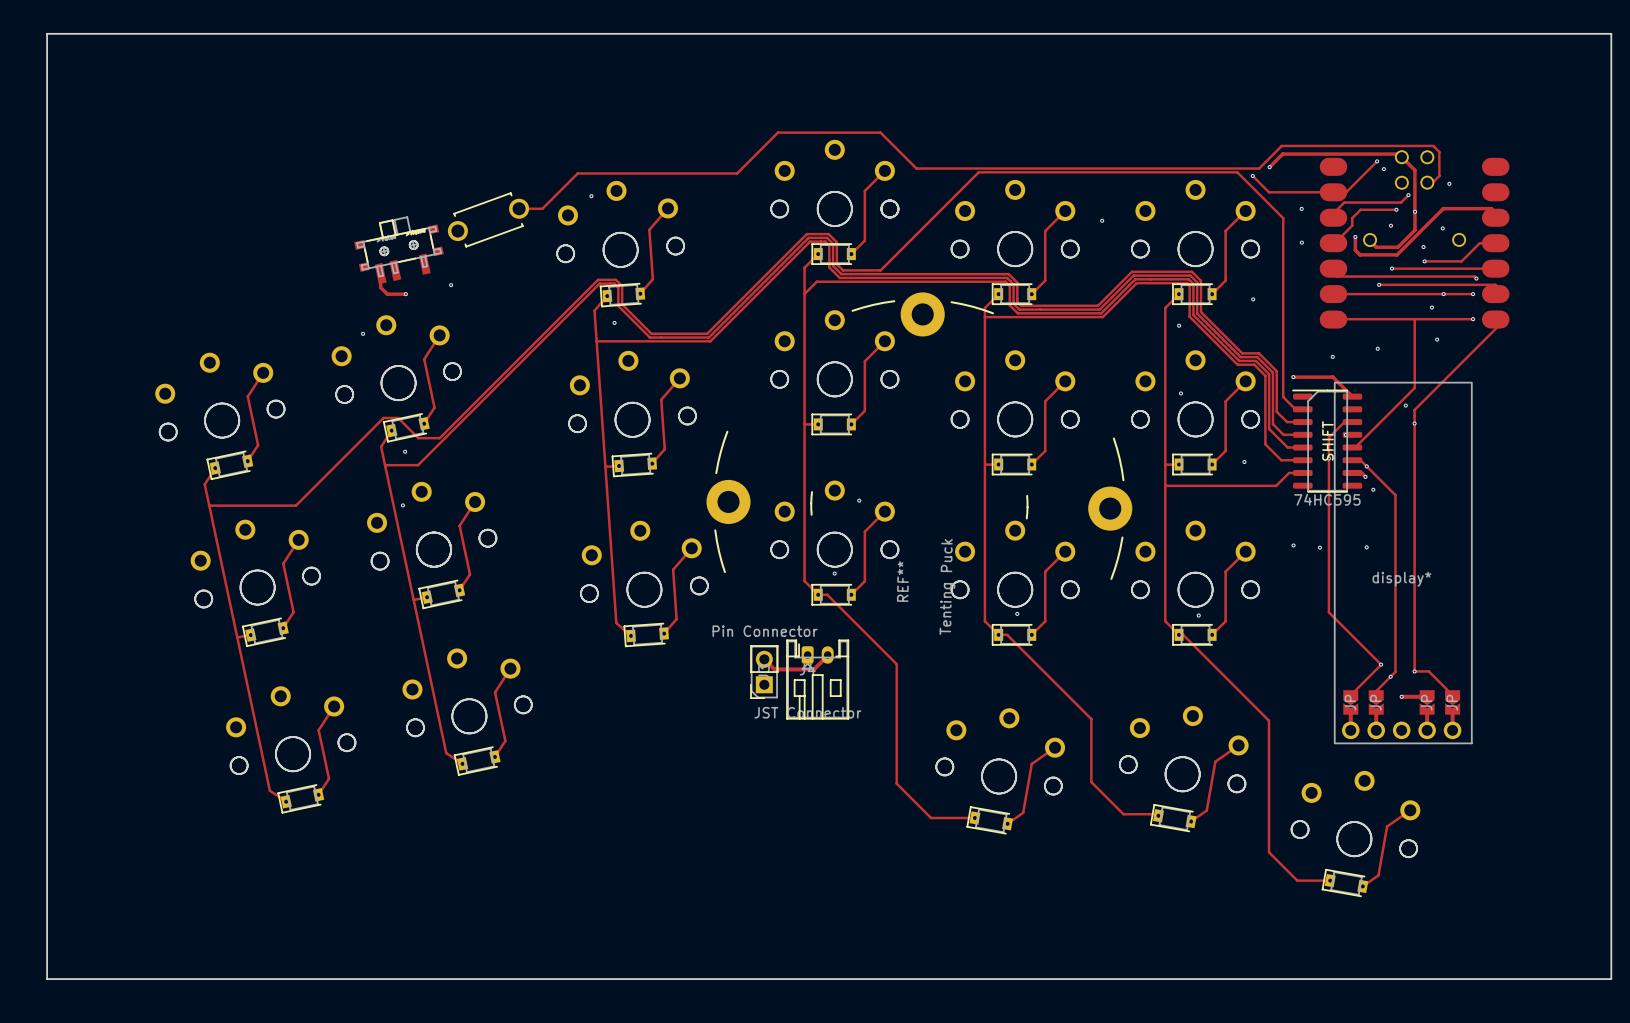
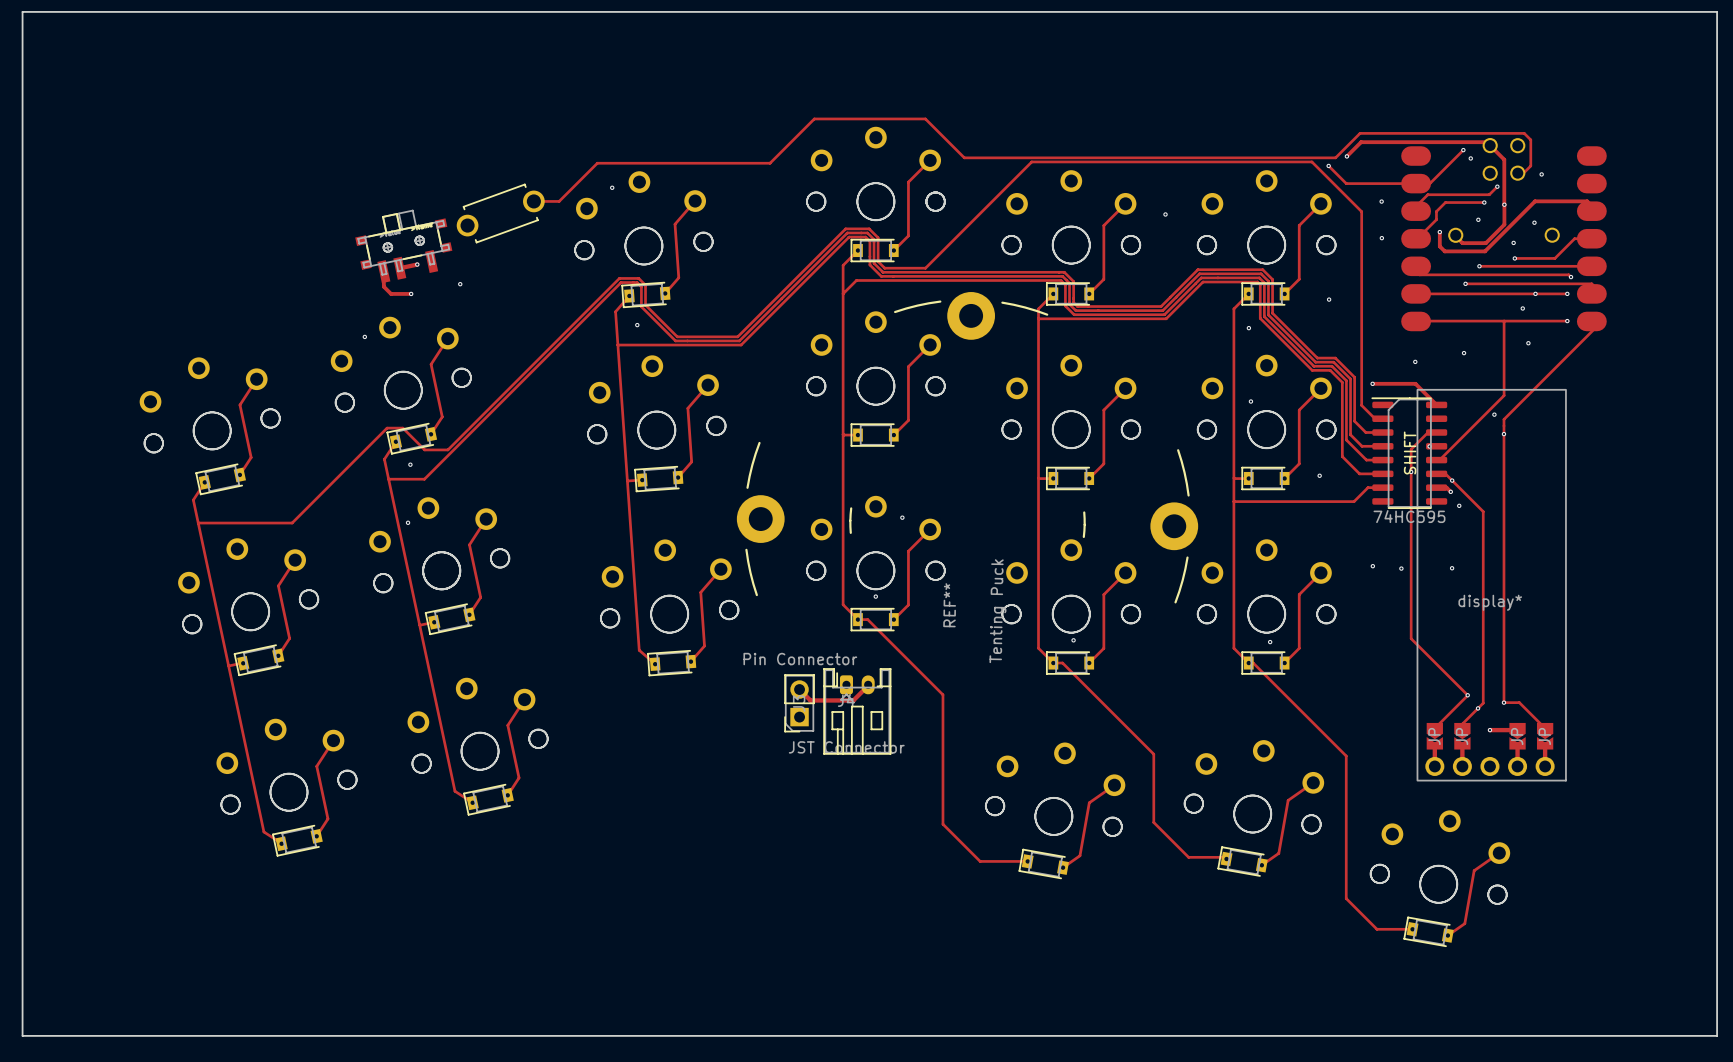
track: none -> (417, 264) (399, 268)
via: none -> (417, 264)

